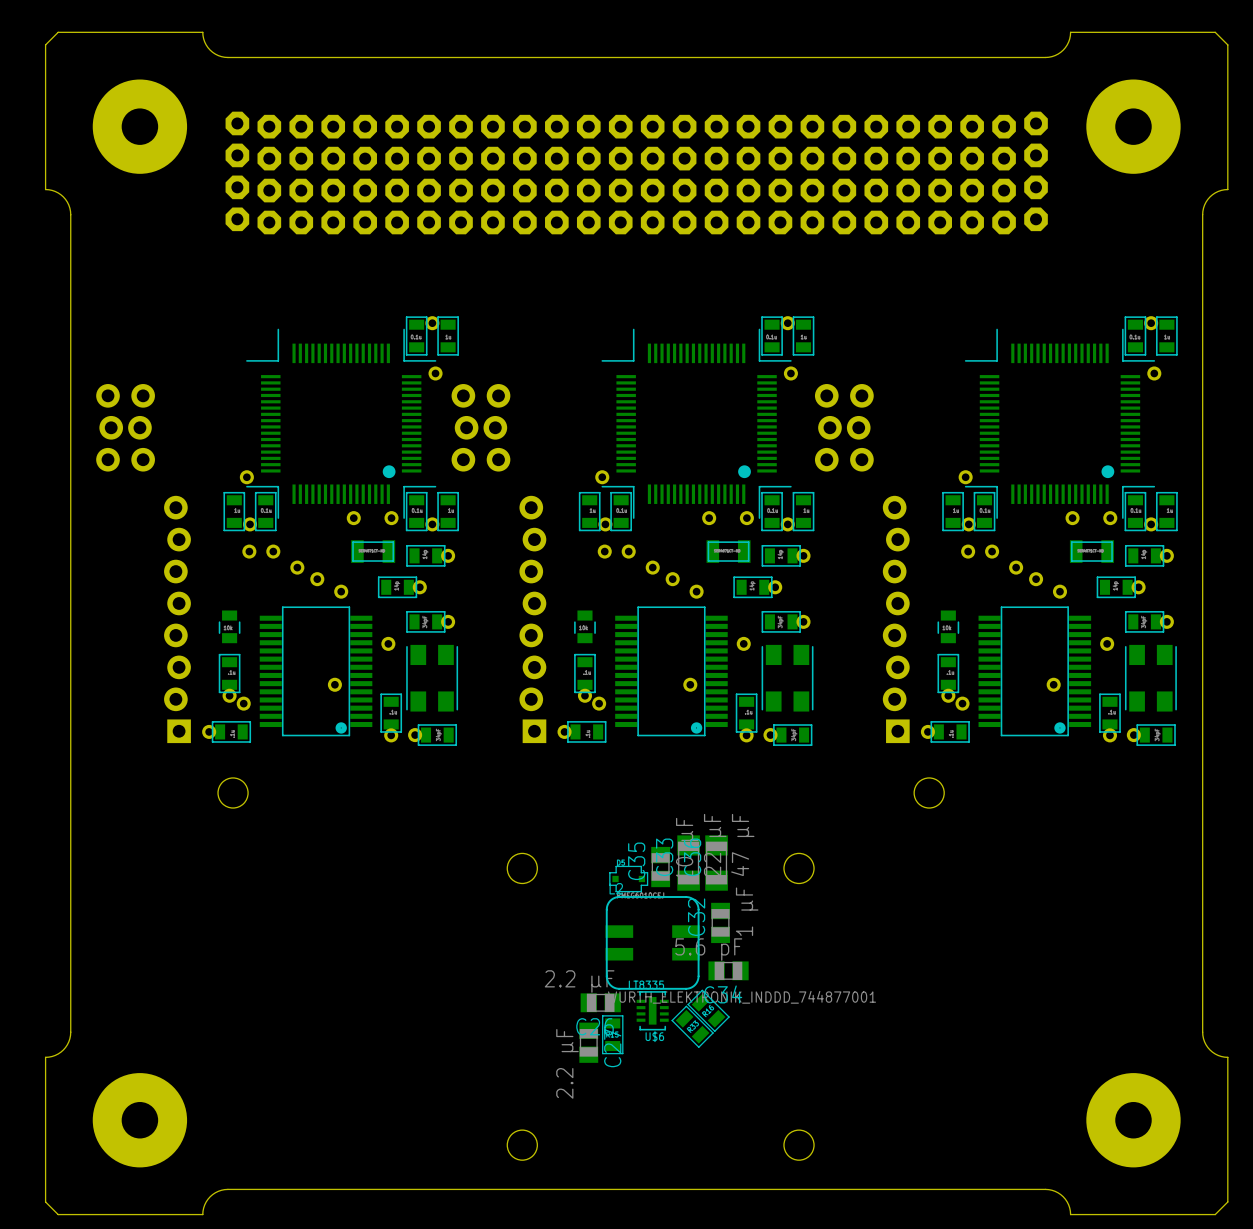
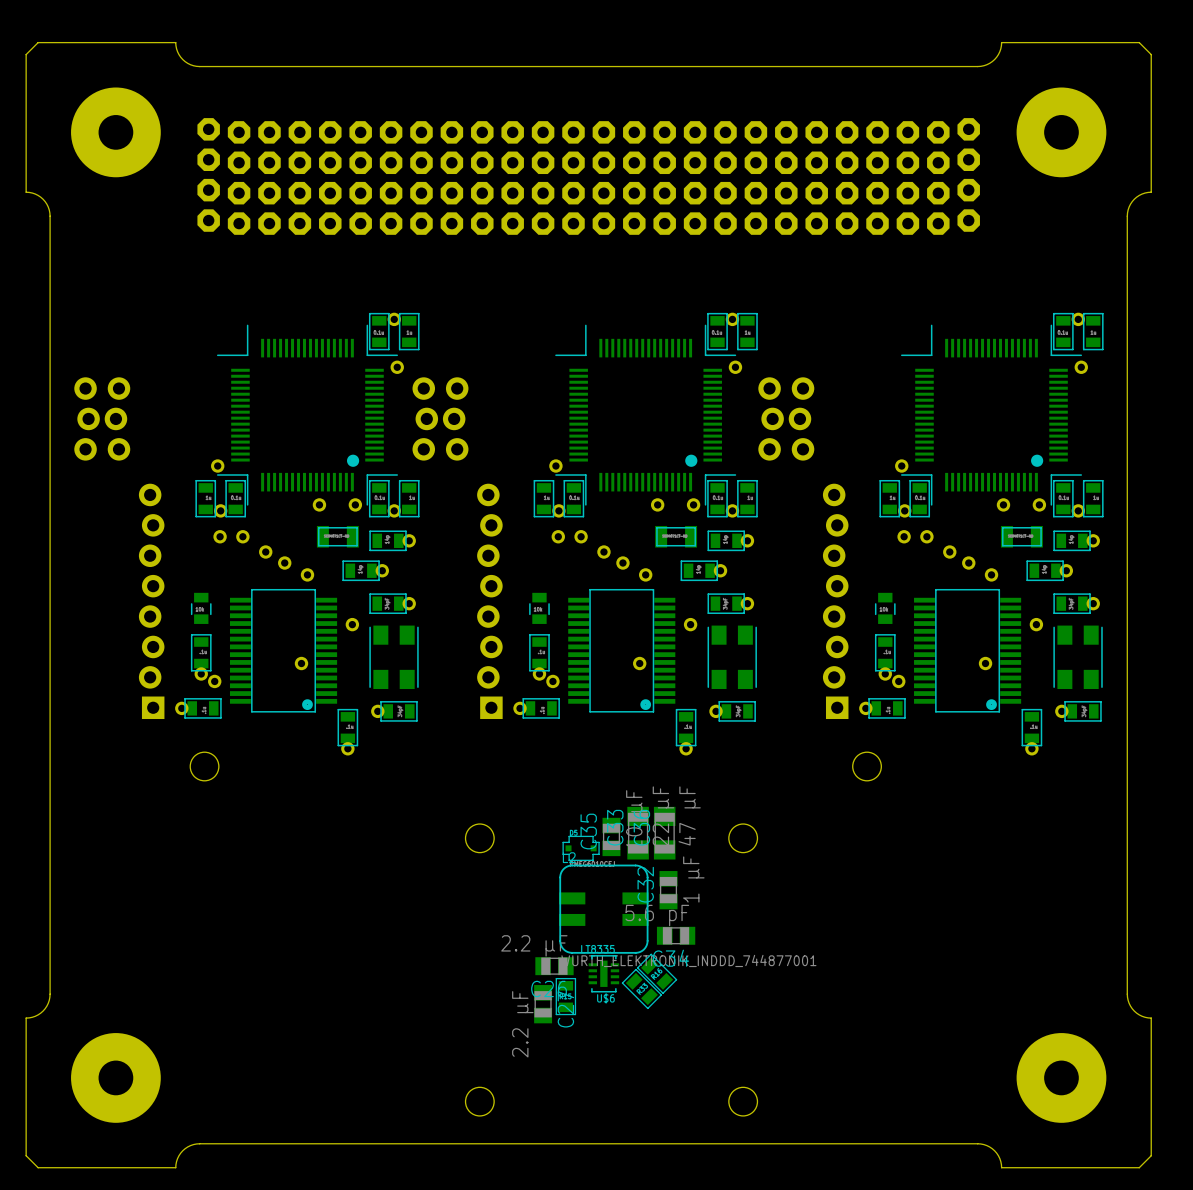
part: (330, 531) -> none
part: (685, 531) -> none
part: (1049, 531) -> none
part: none -> (297, 534)
part: none -> (635, 534)
part: none -> (981, 534)

